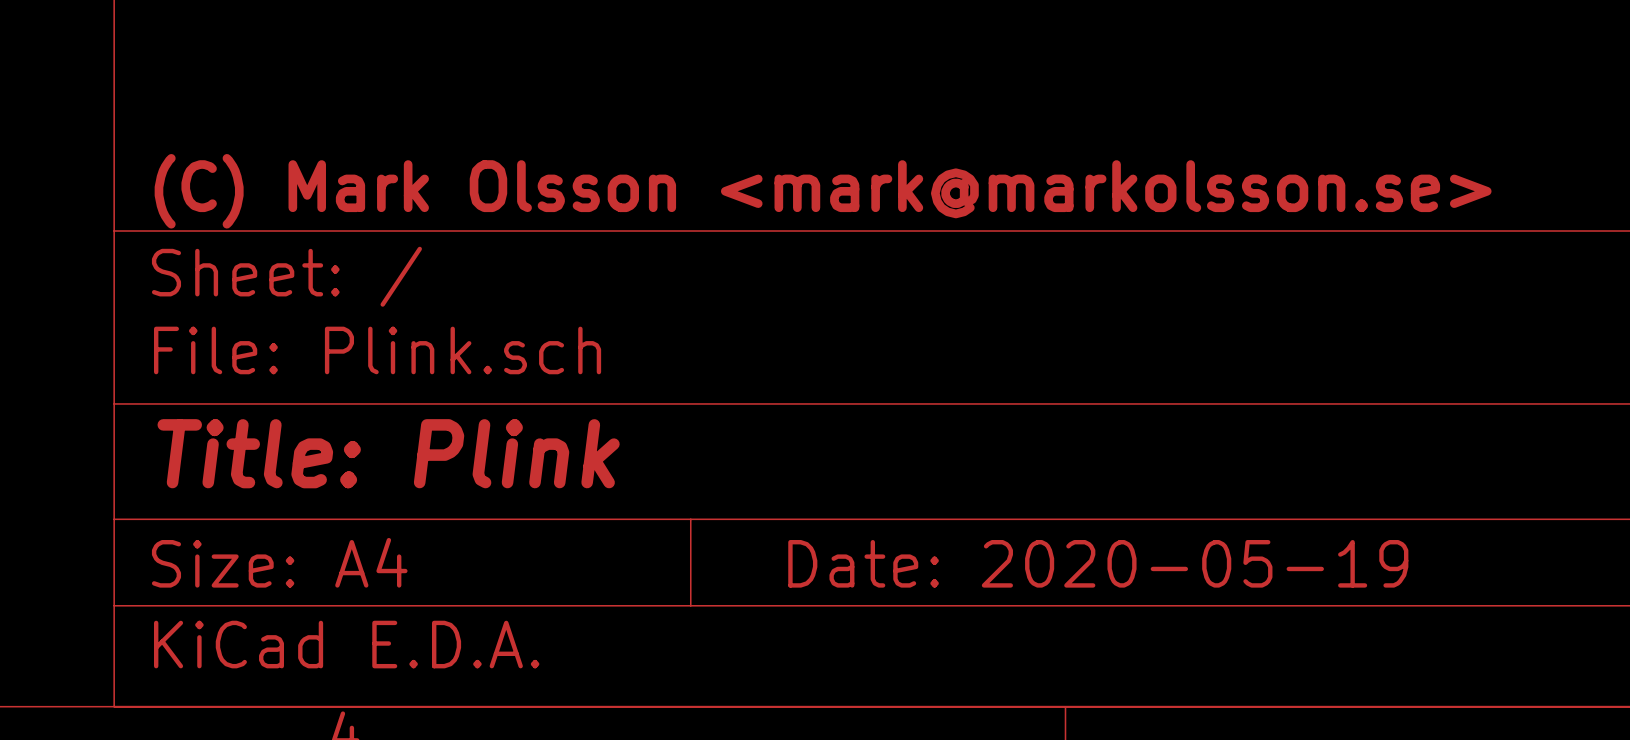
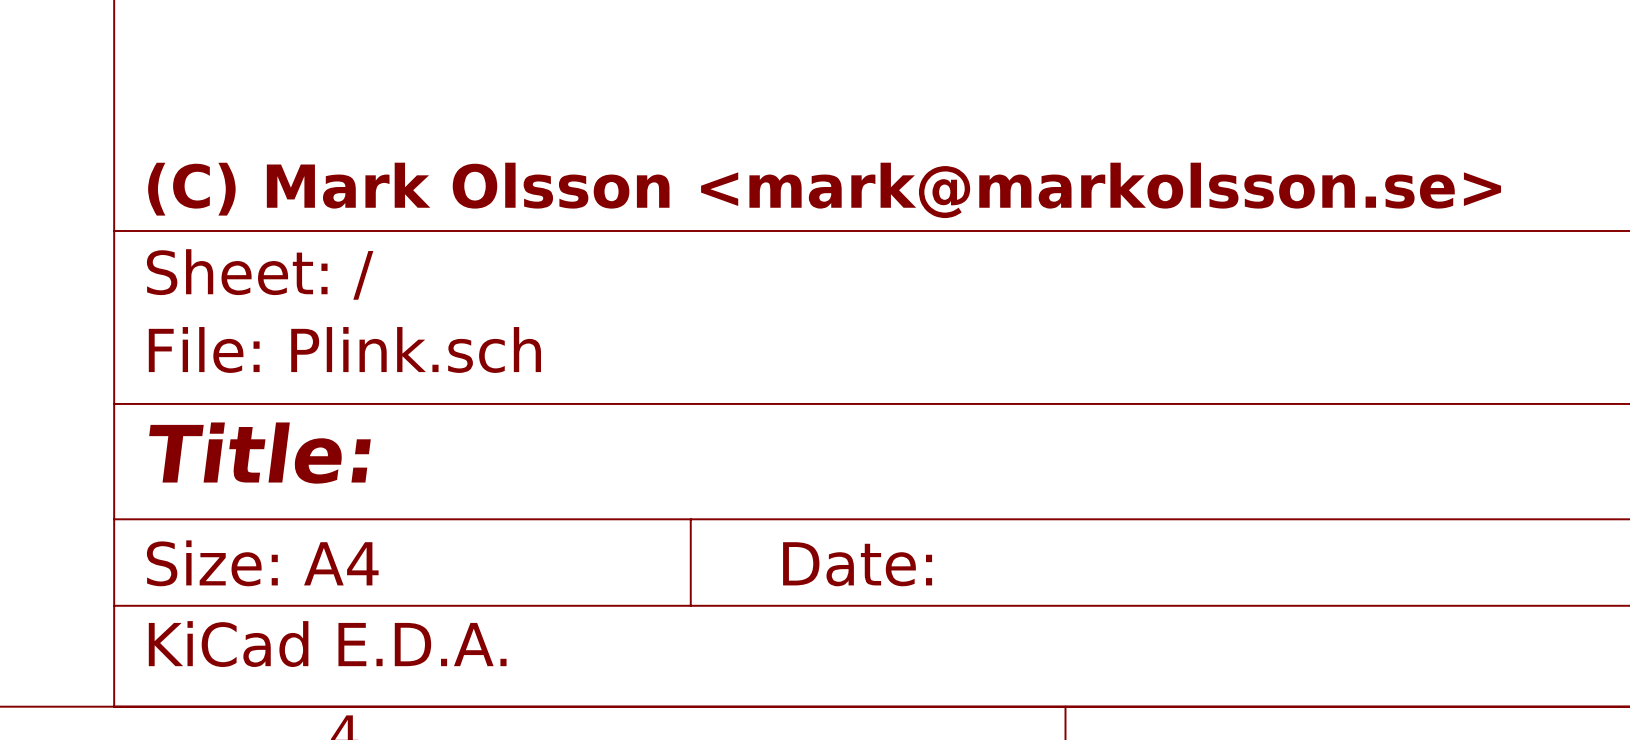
title block: Title: Plink (388, 453) -> Title: (259, 453)
title block: Date: 2020-05-19 (1098, 563) -> Date: (857, 564)

